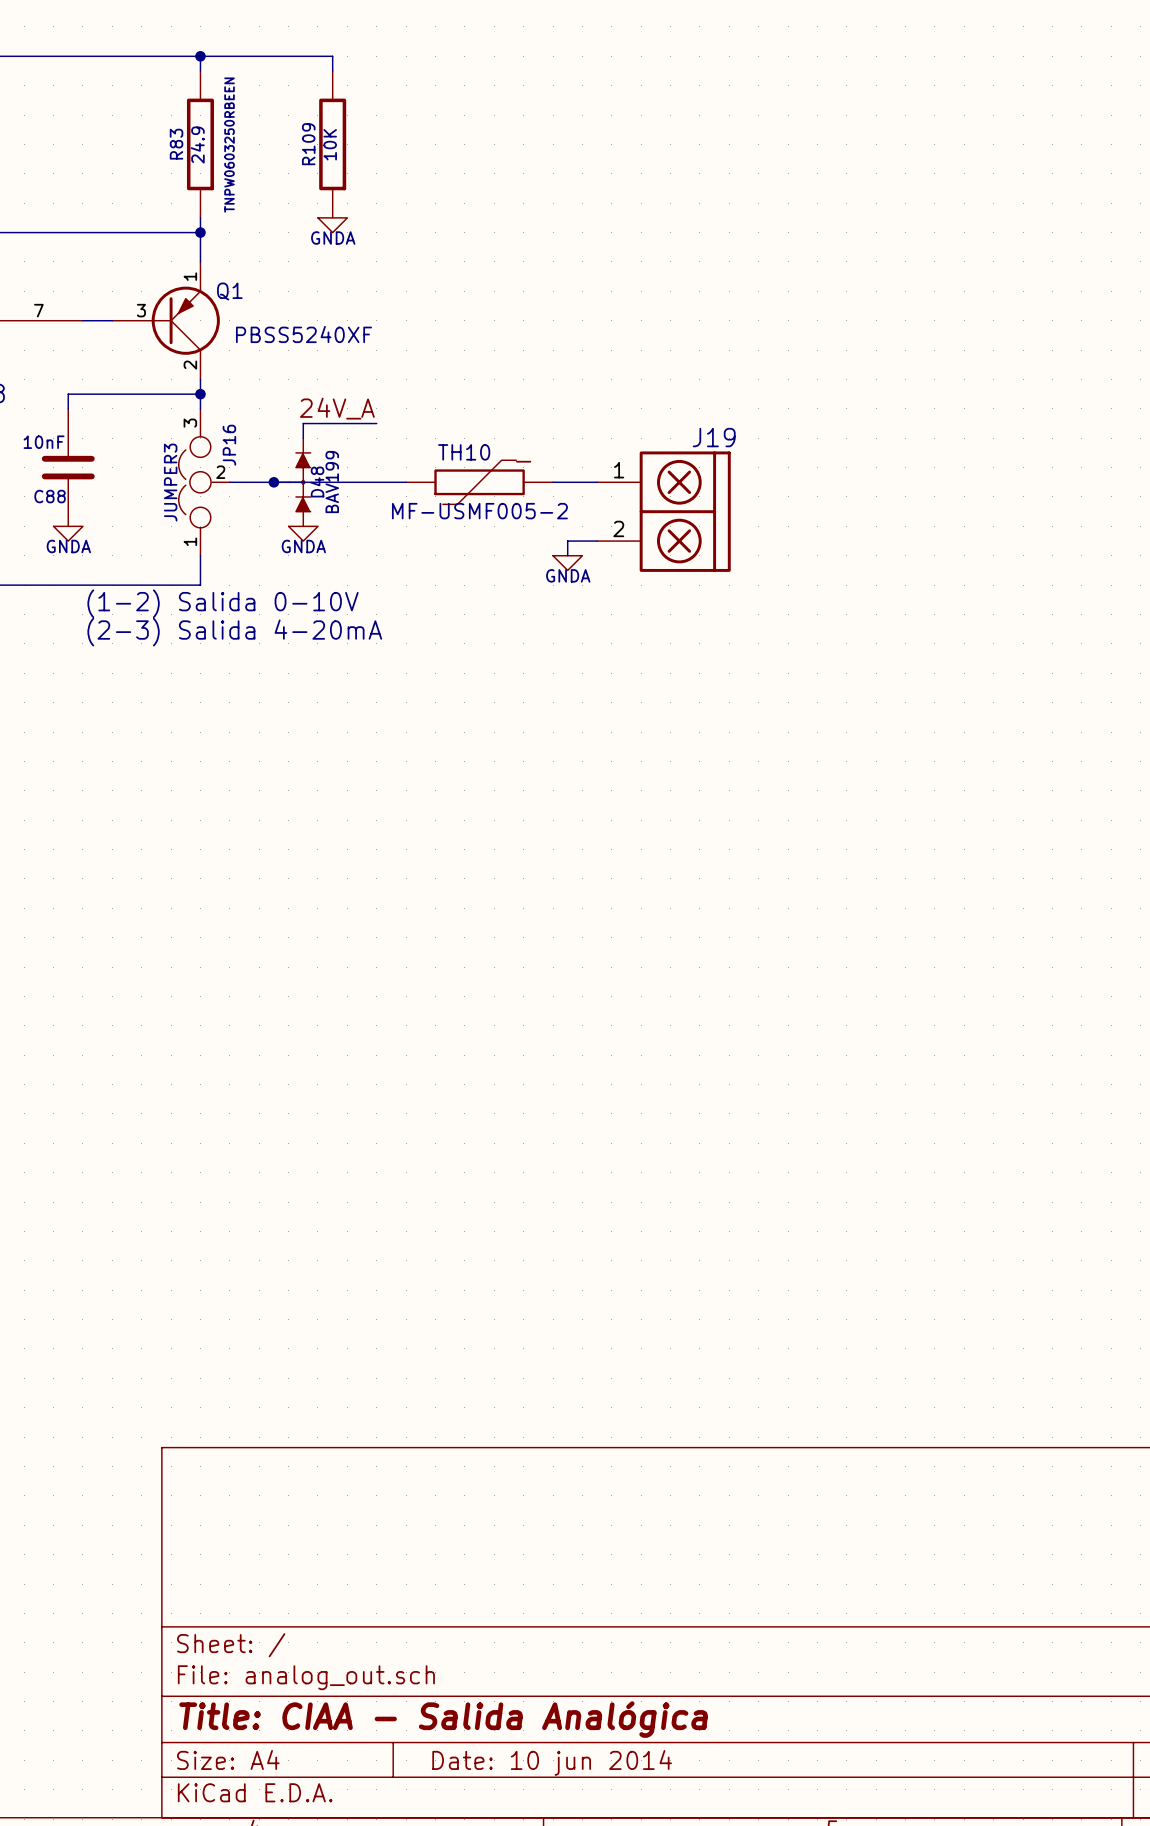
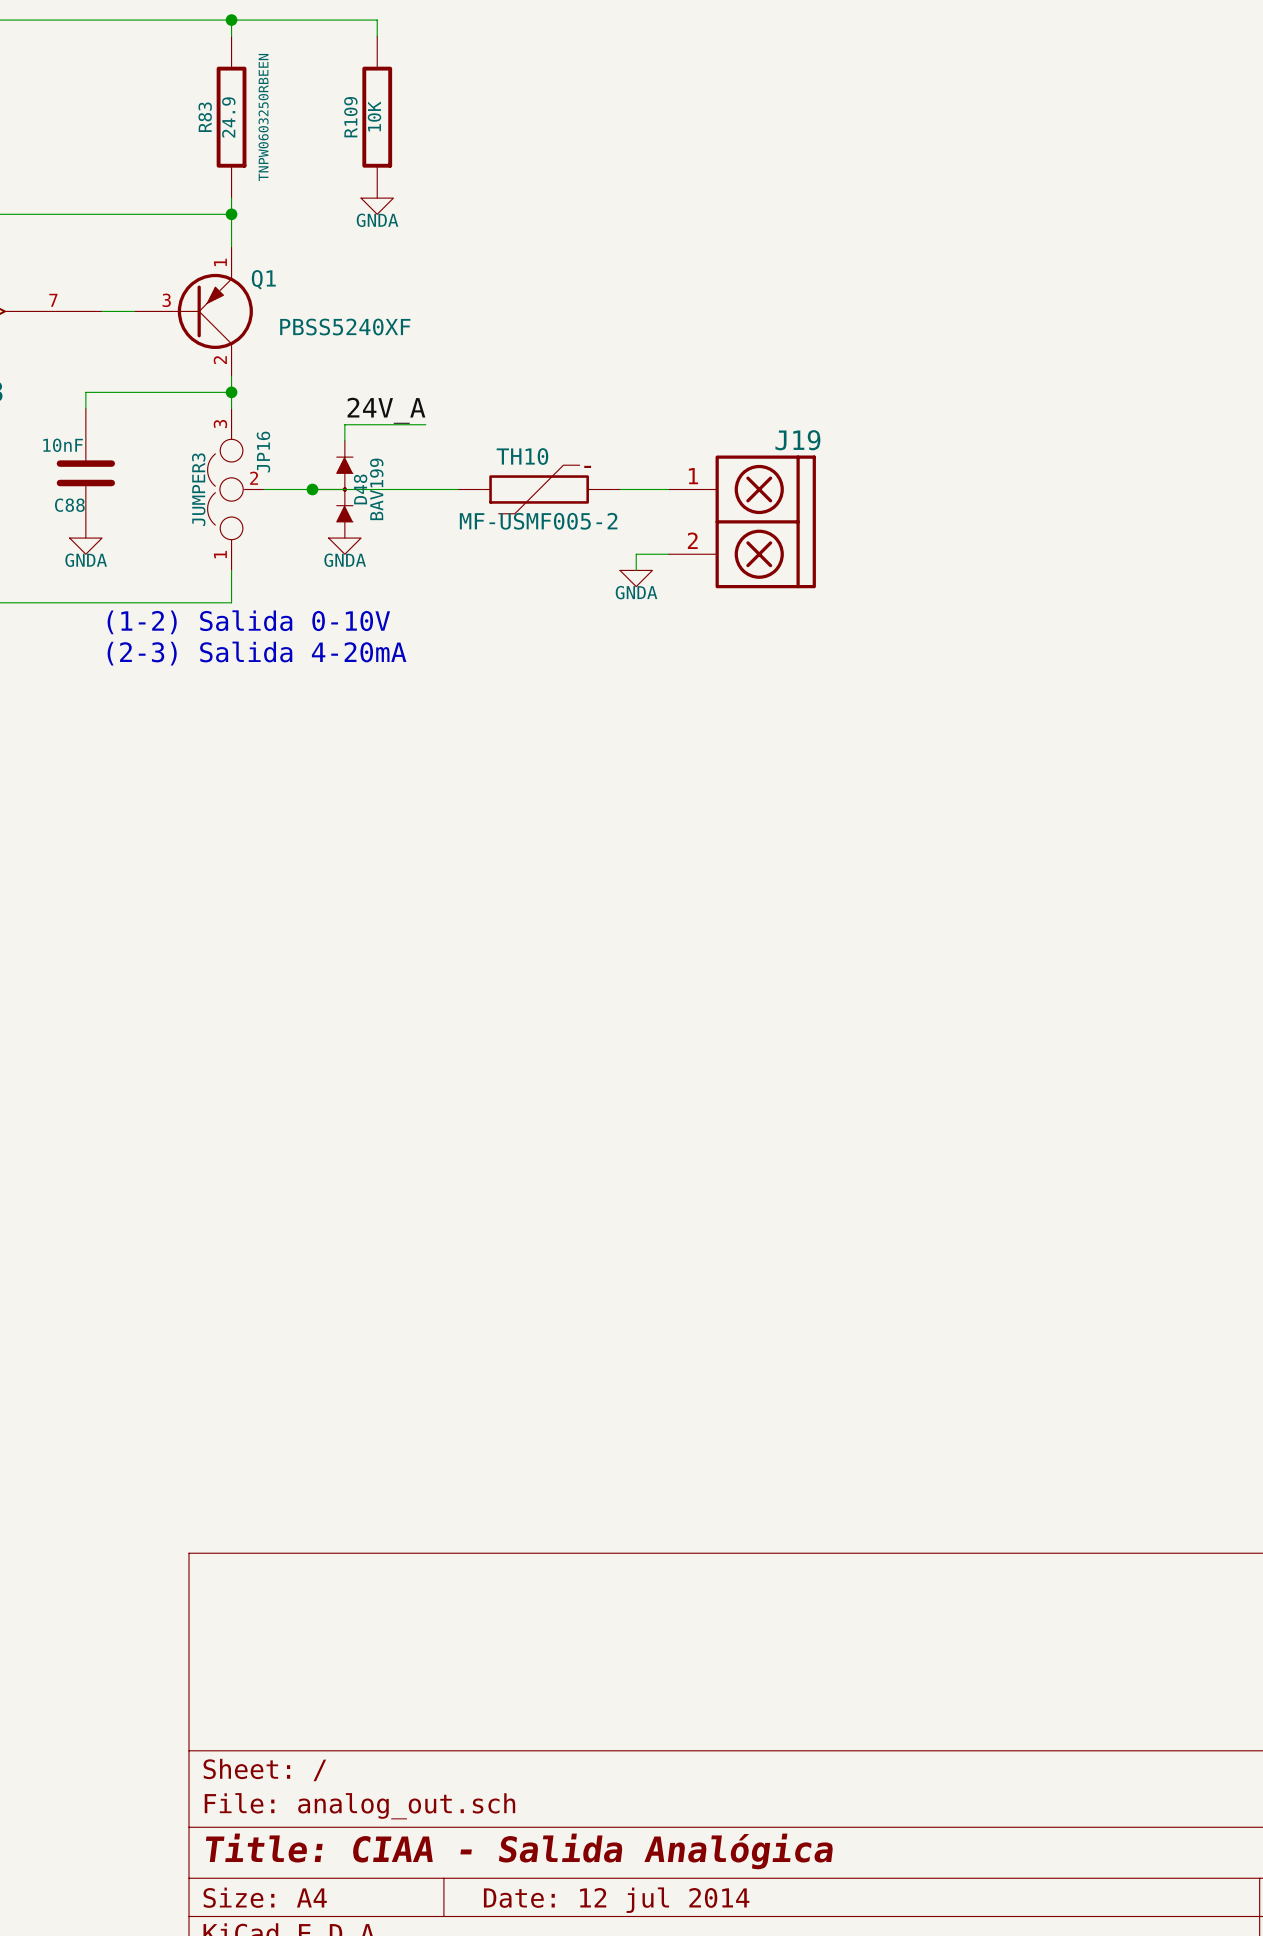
title block: Date: 10 jun 2014 (552, 1762) -> Date: 12 jul 2014 (616, 1900)

